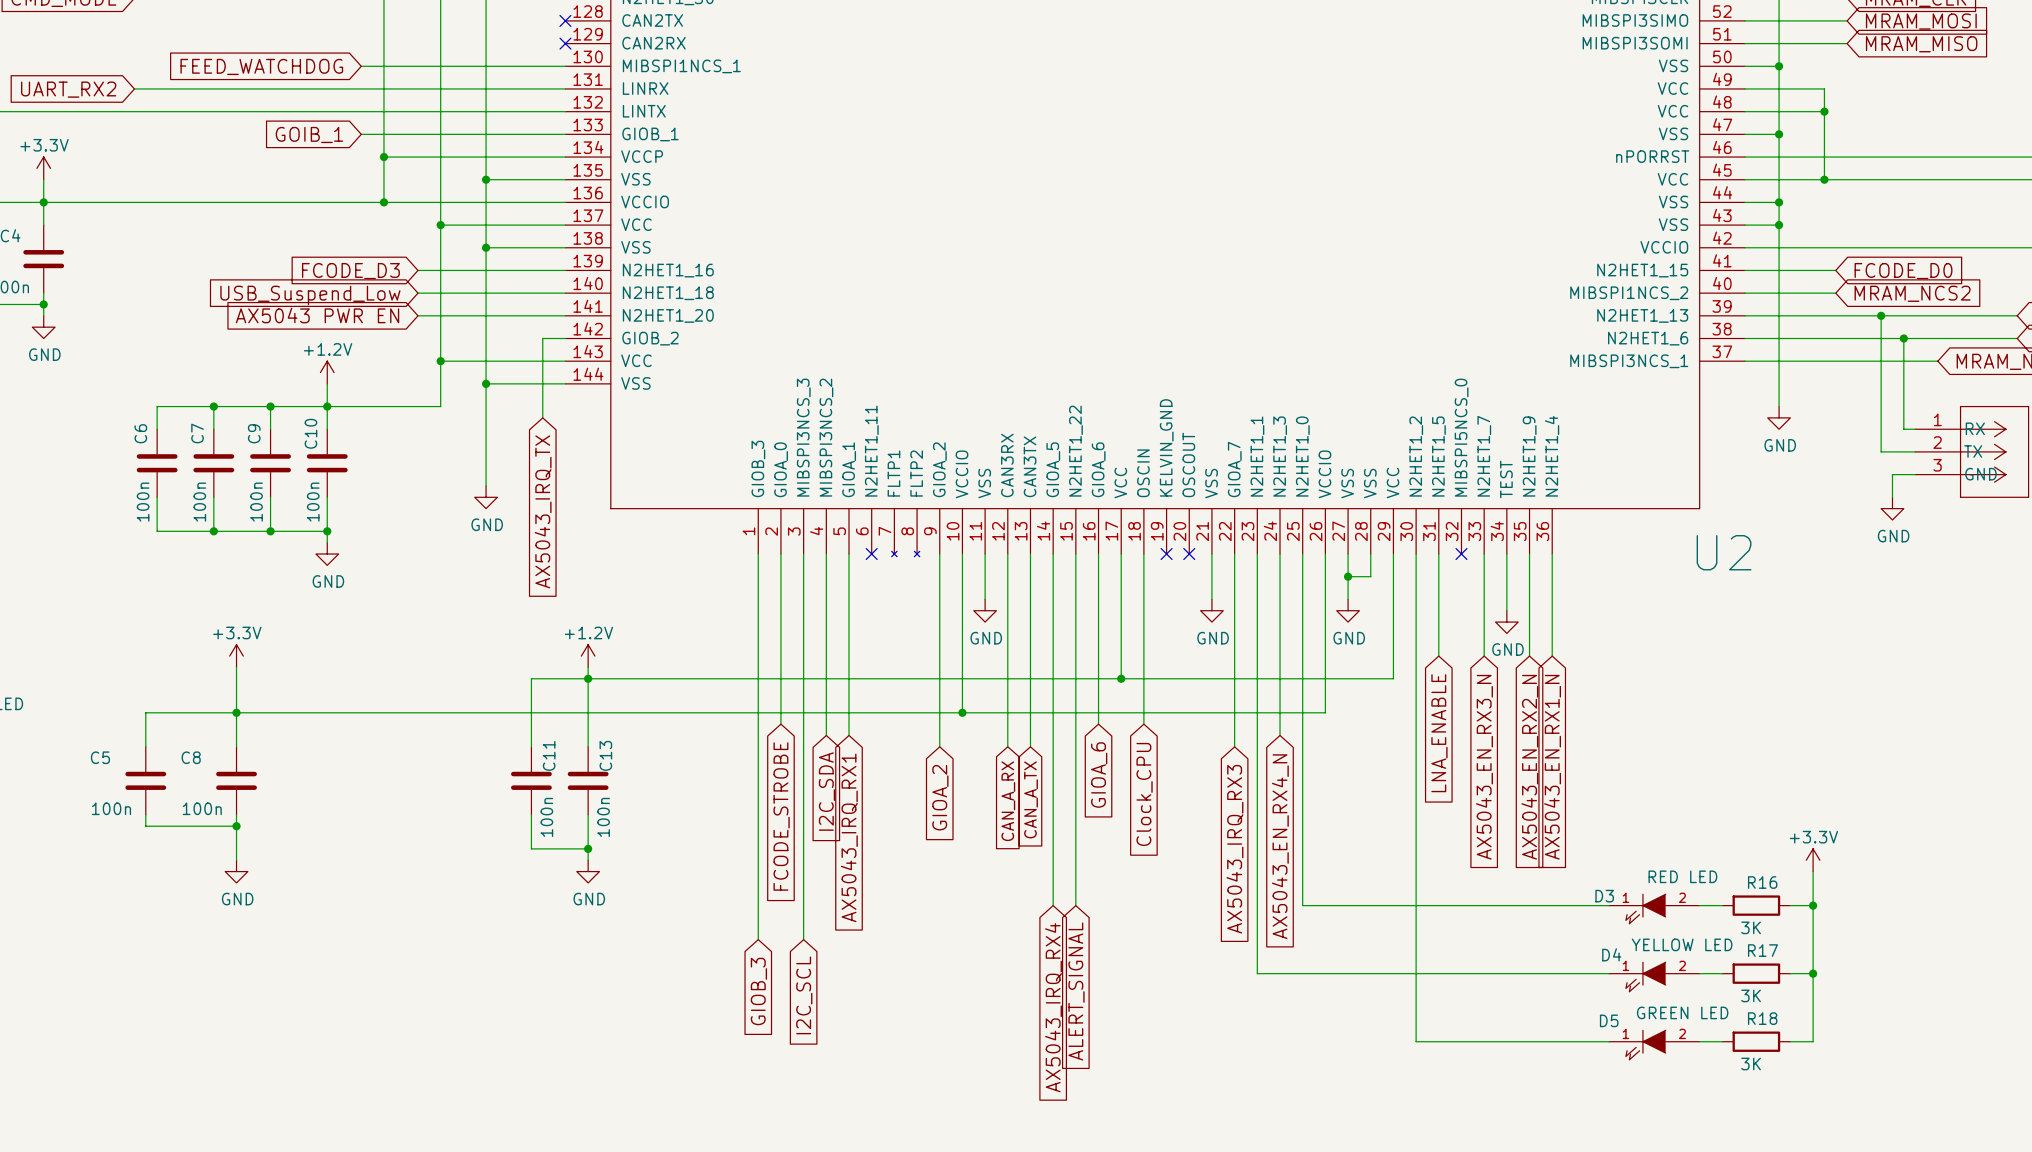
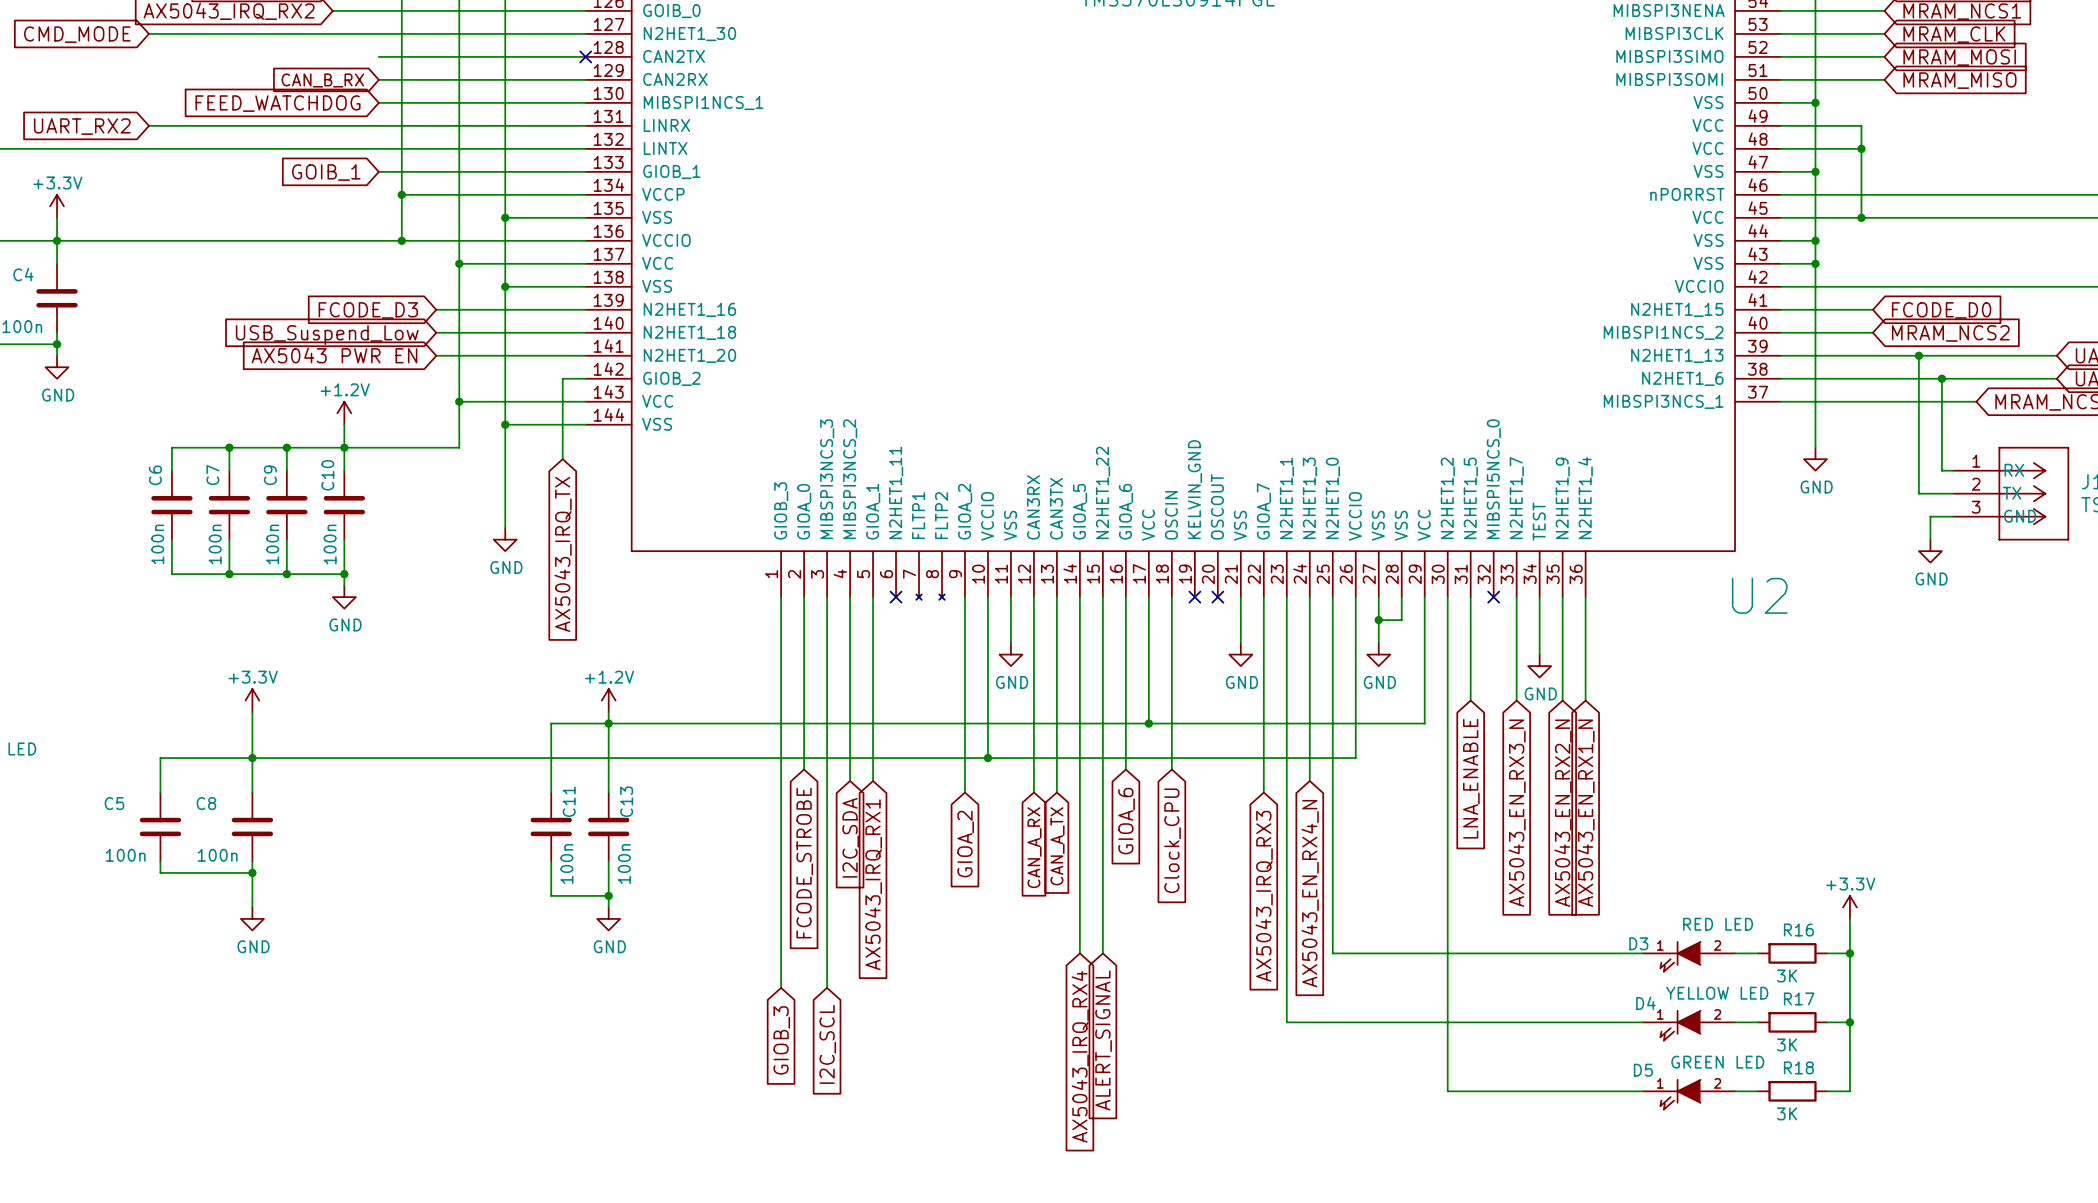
wire: none -> (378, 56) (585, 56)
wire: none -> (378, 79) (585, 79)
no-connect mark: (565, 43) -> none
global label: none -> CAN_B_RX (322, 80)

